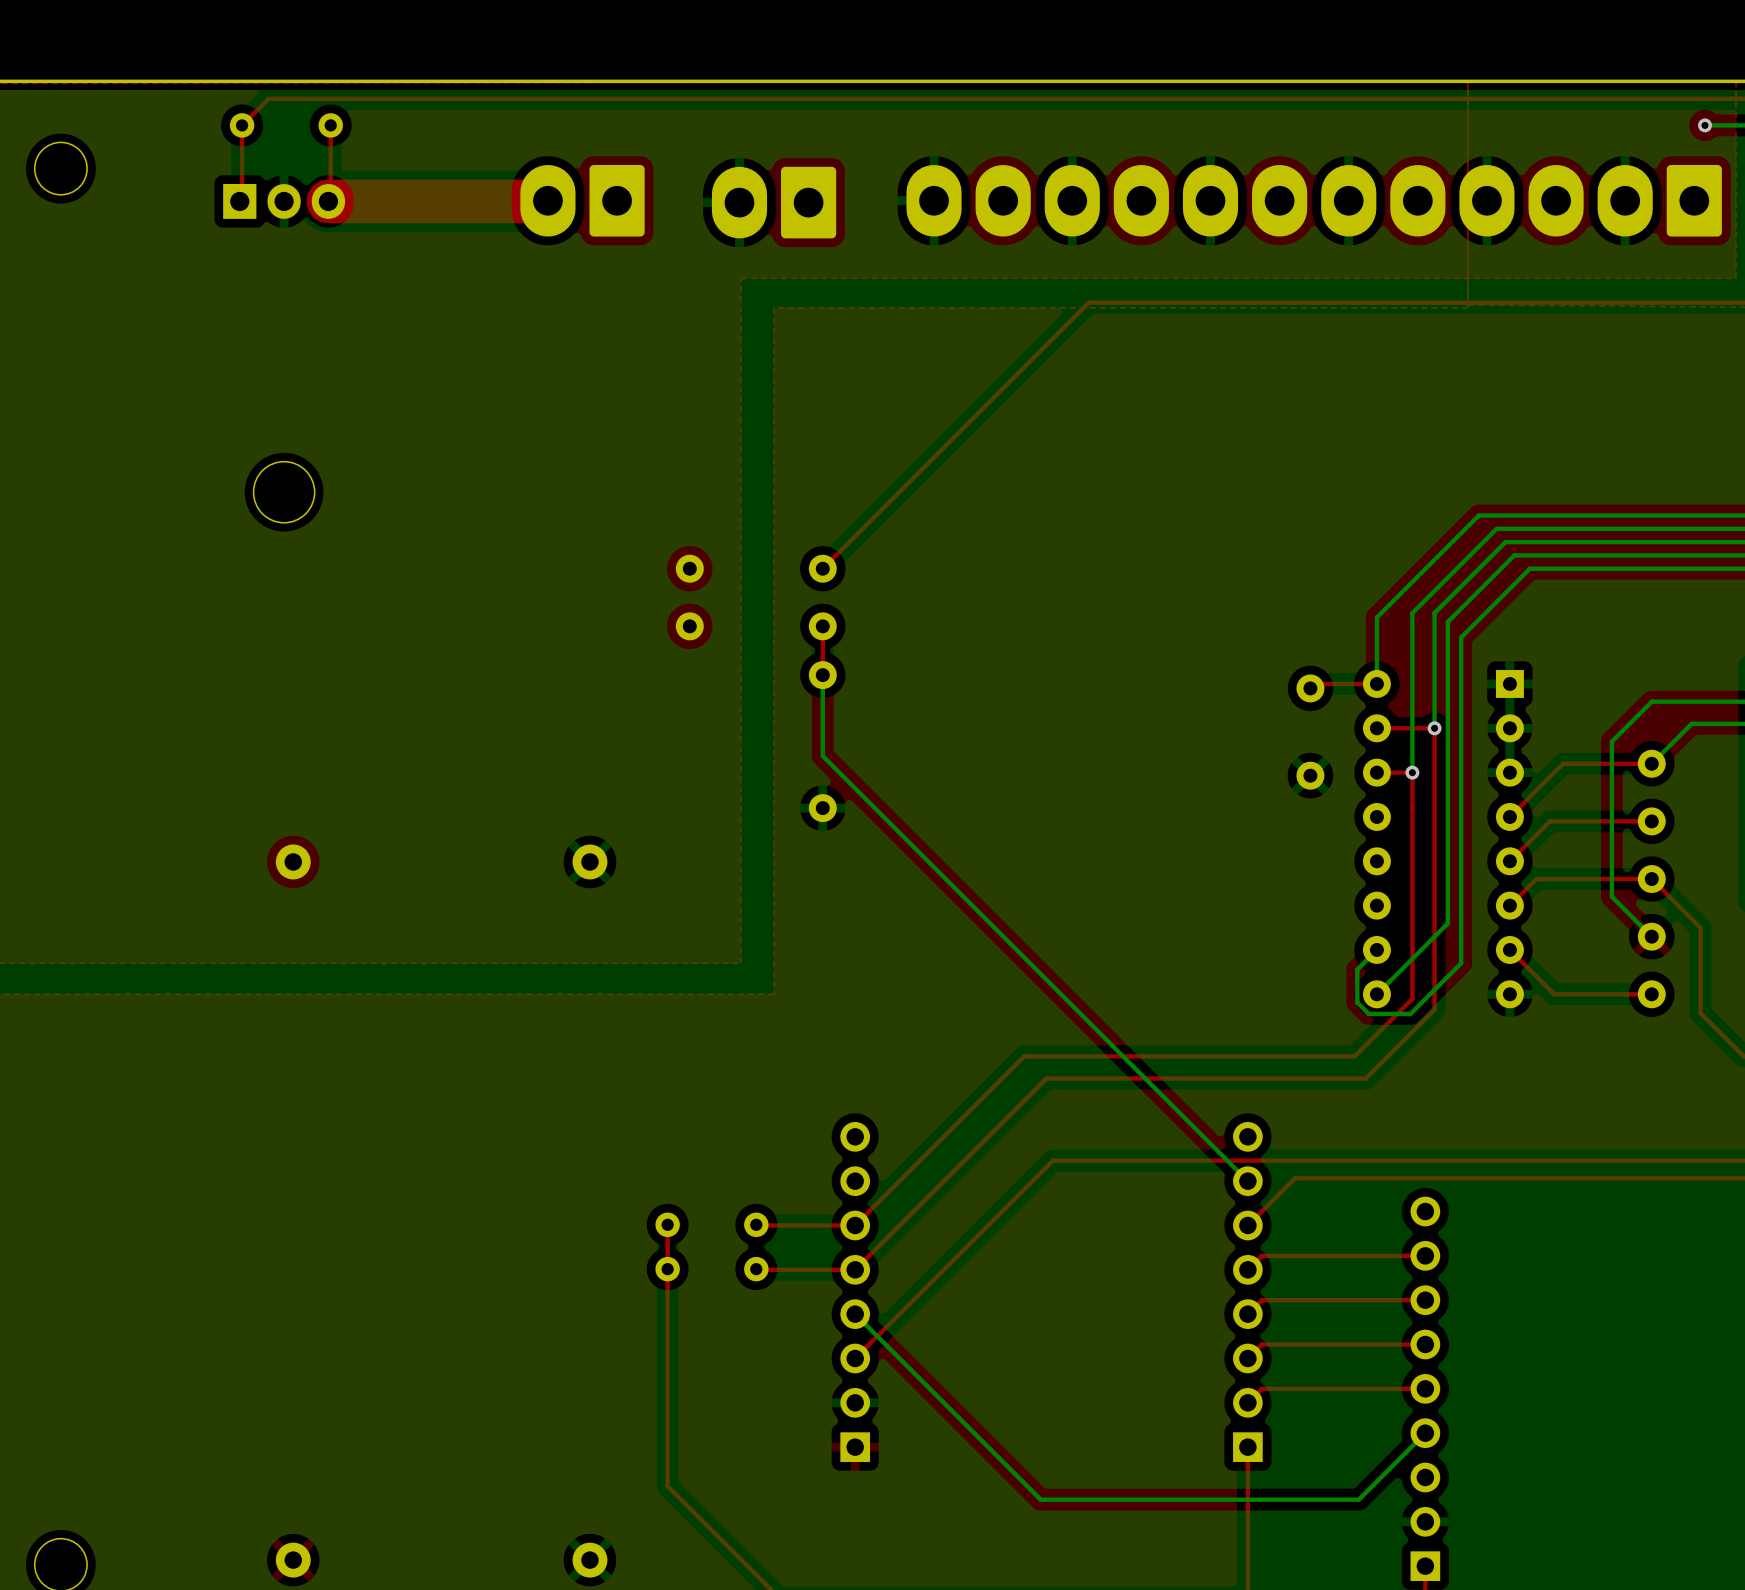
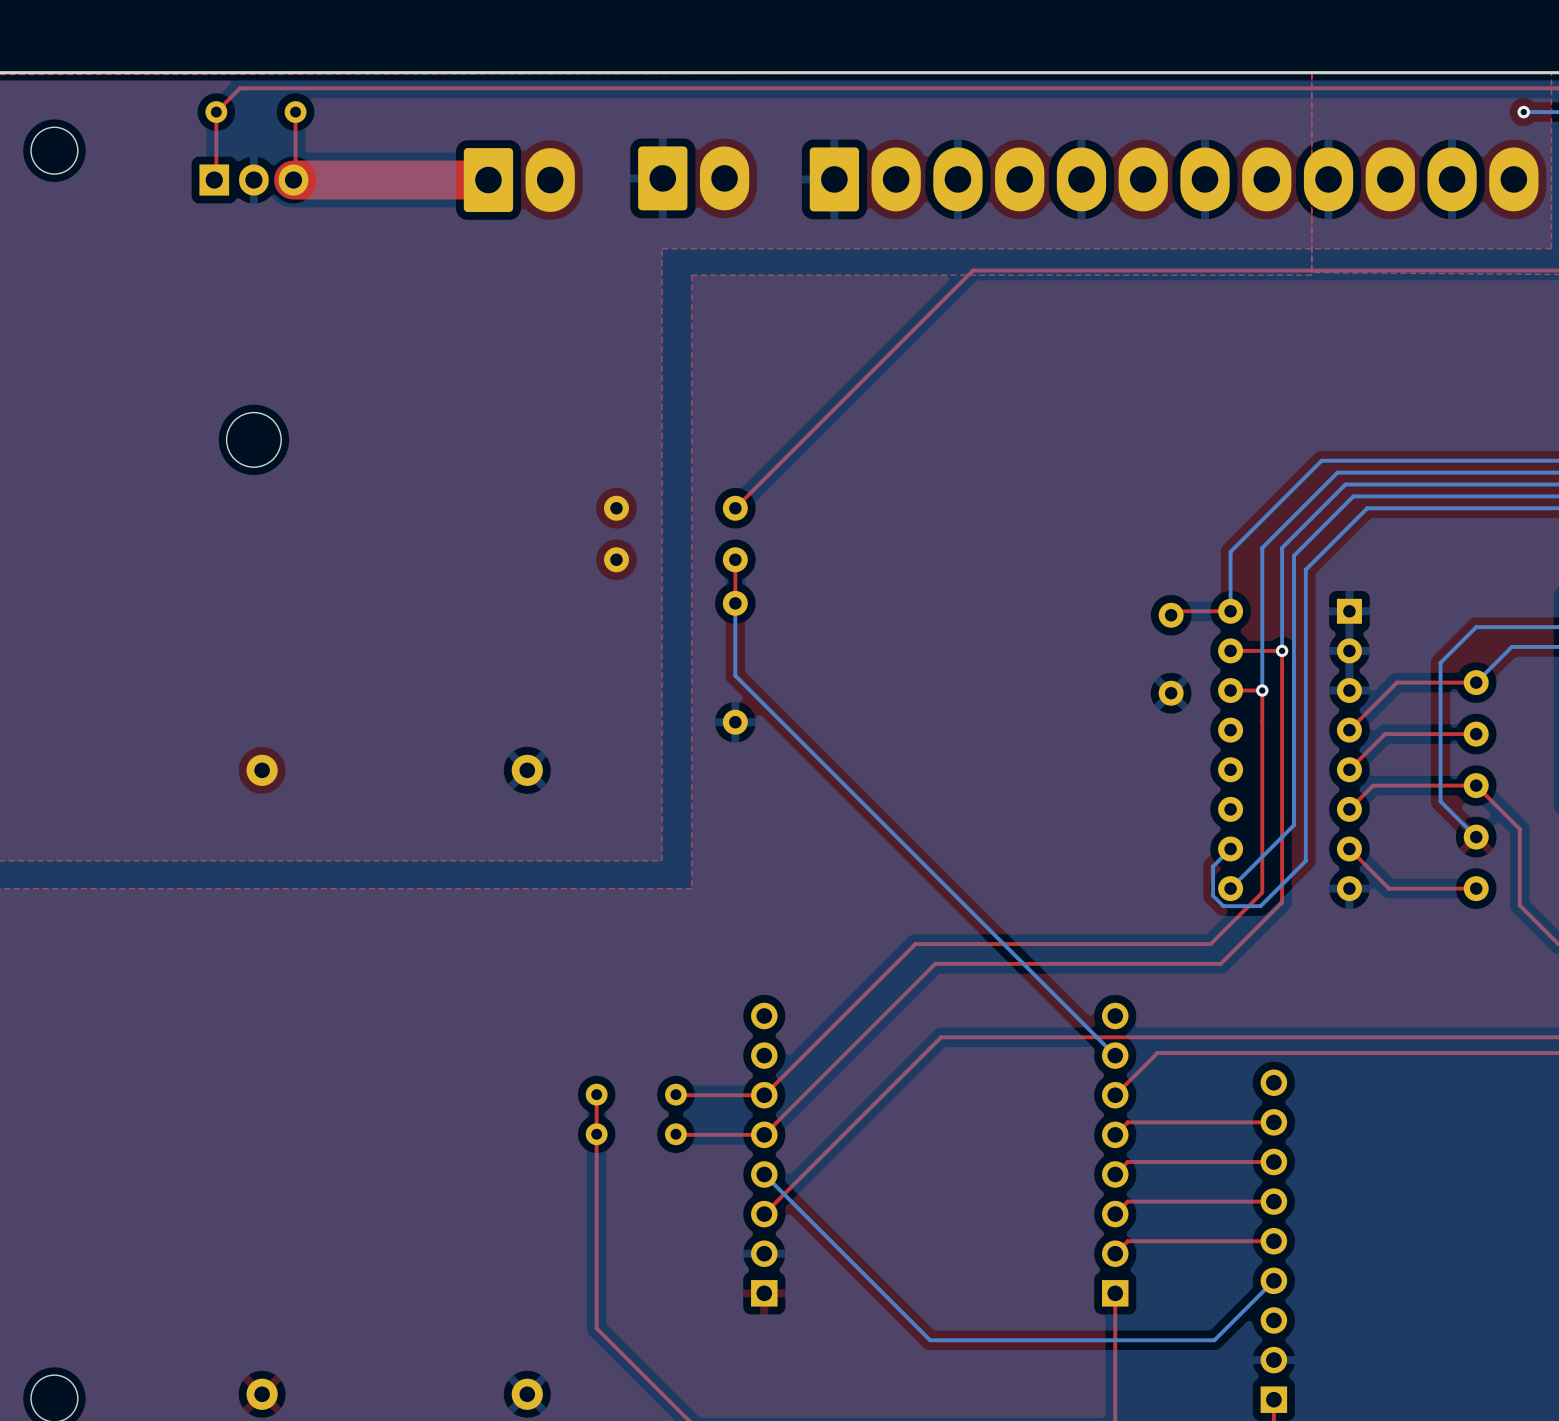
part rotation: 0° (582, 200) -> 180° (519, 180)
part rotation: 0° (1314, 200) -> 180° (1174, 179)
part rotation: 0° (774, 202) -> 180° (693, 178)

